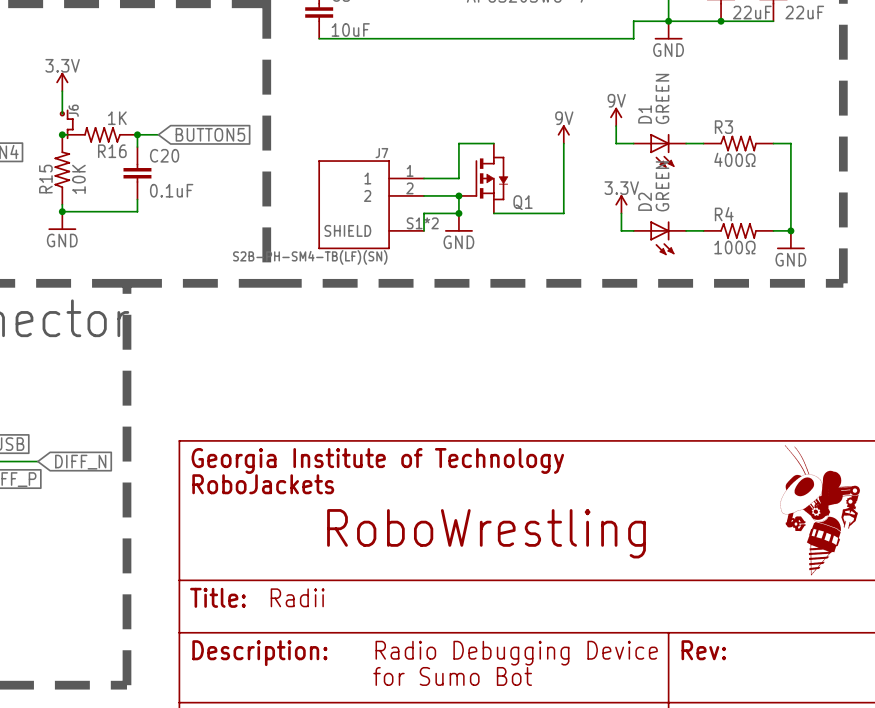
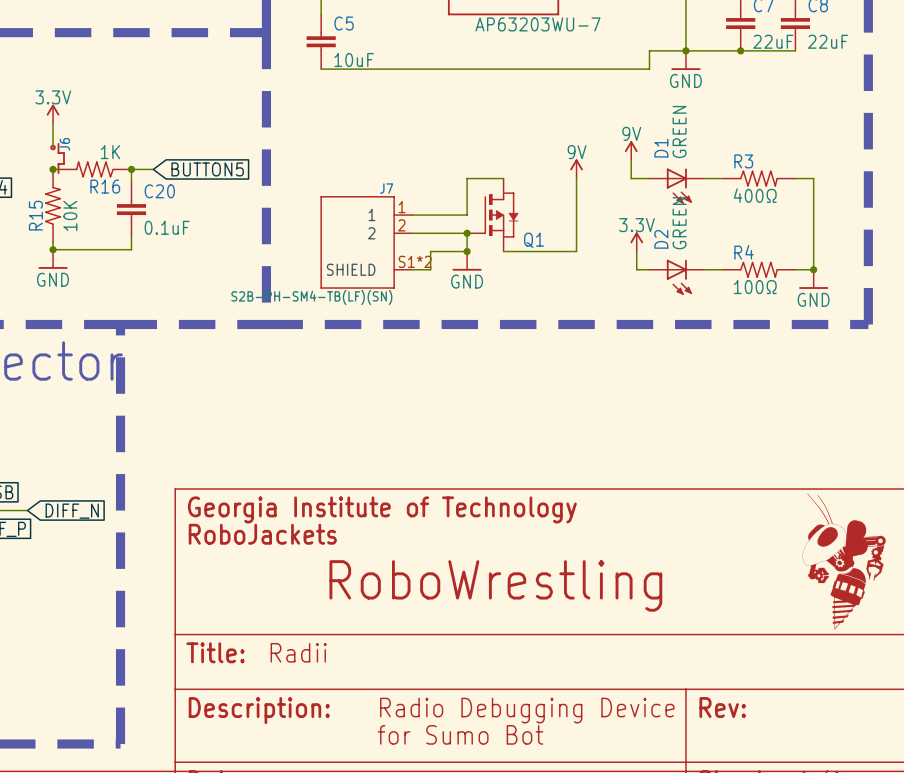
J7 symbol: [318, 160, 425, 249] -> [320, 196, 413, 289]

